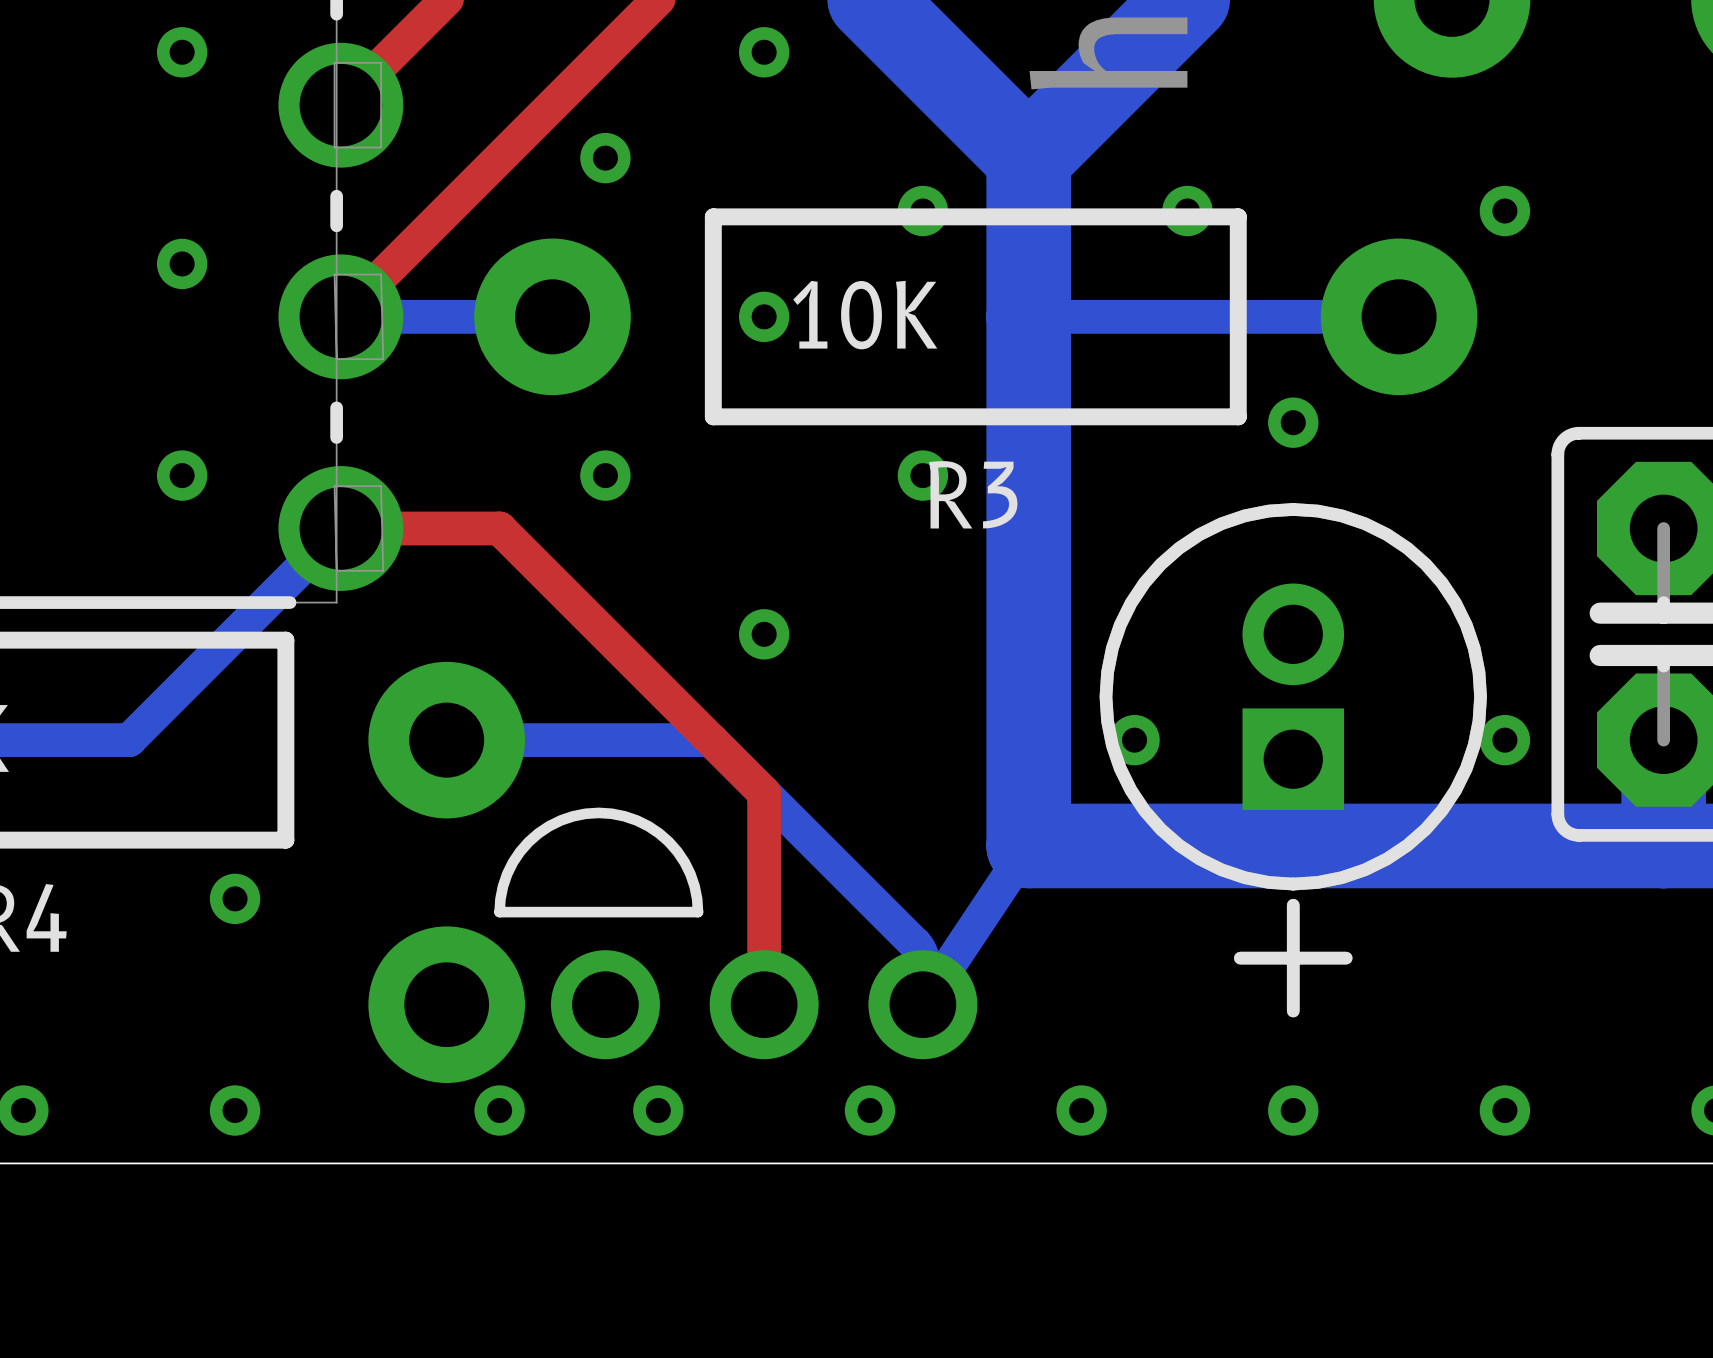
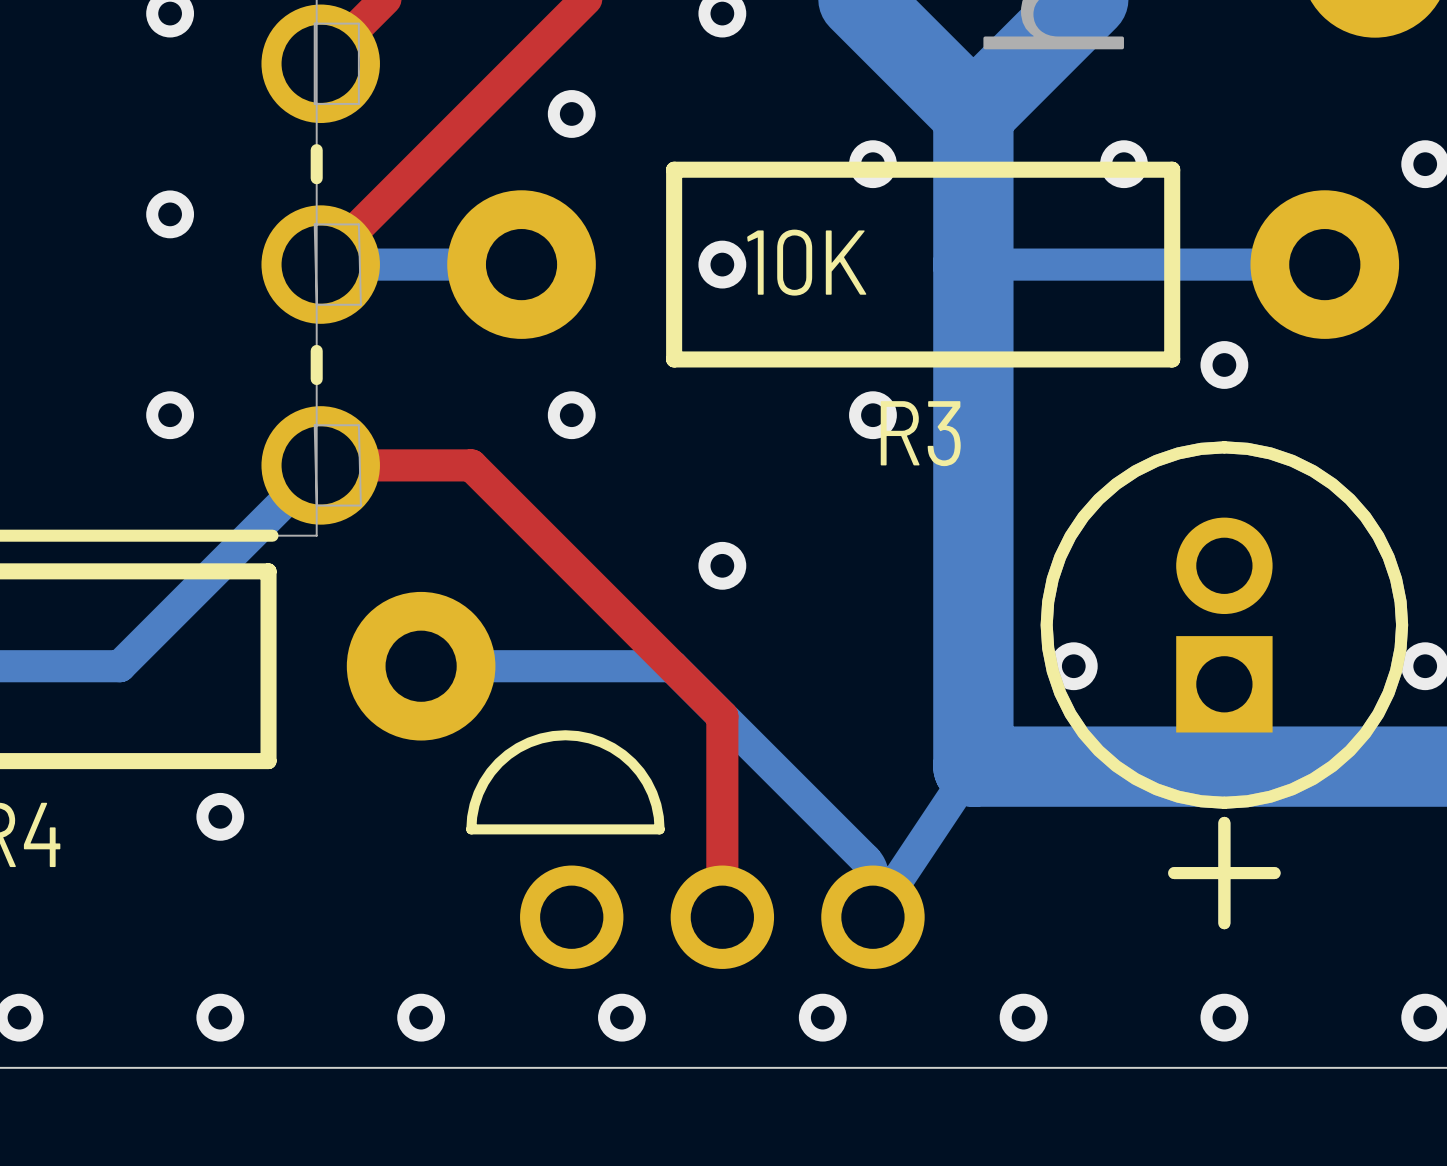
part: (446, 1004) -> none
via position: (499, 1110) -> (421, 1017)

